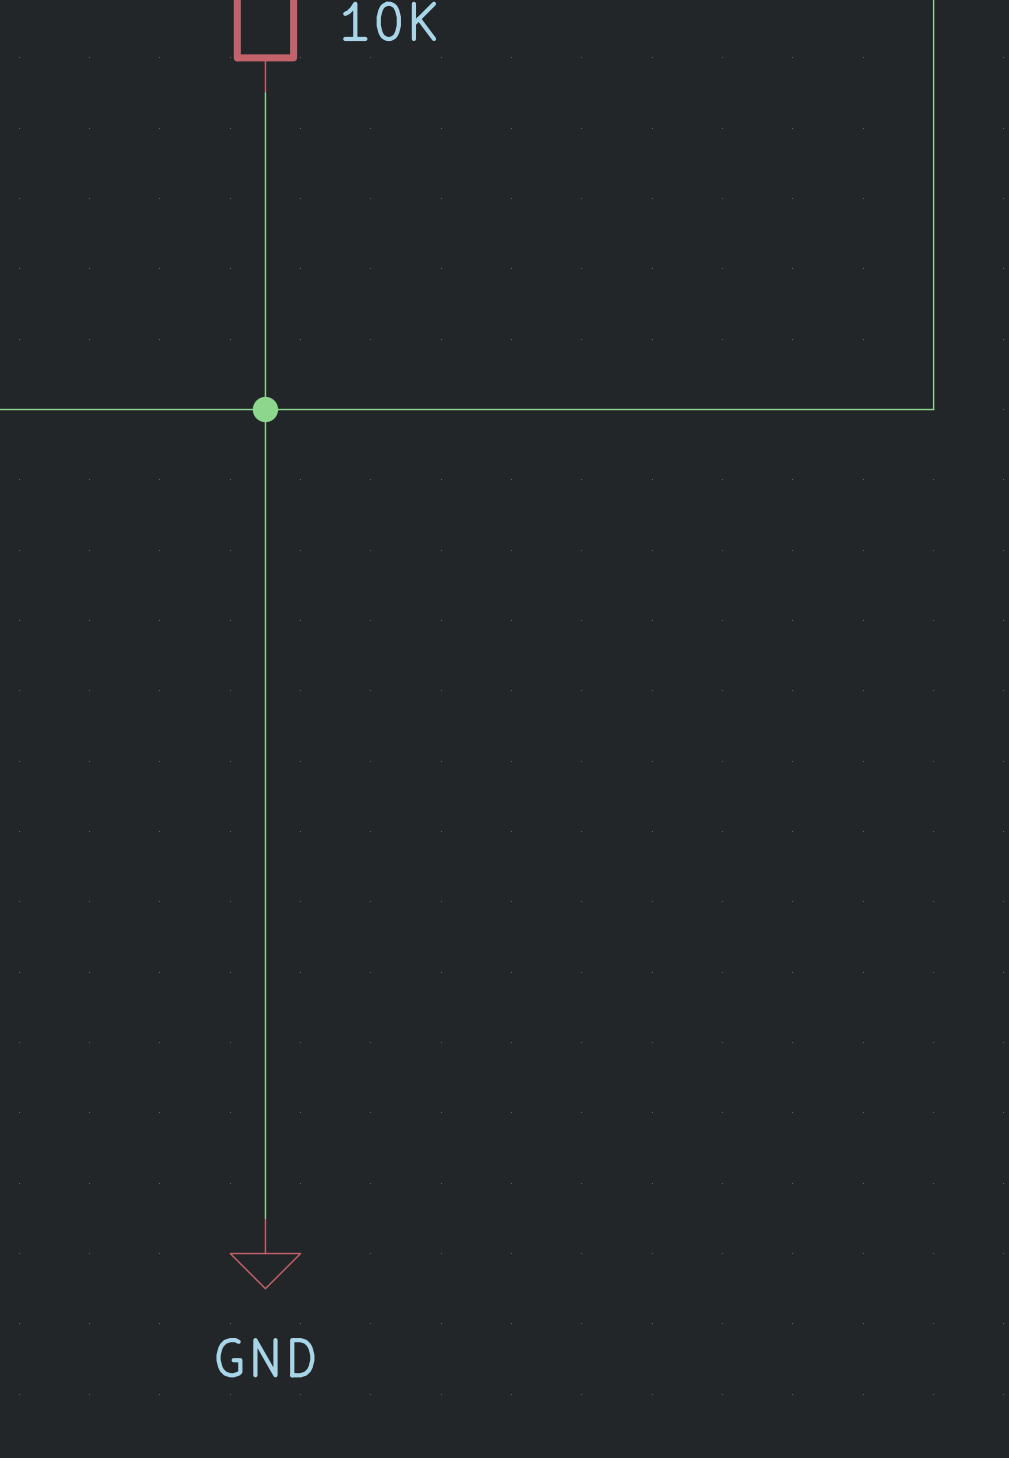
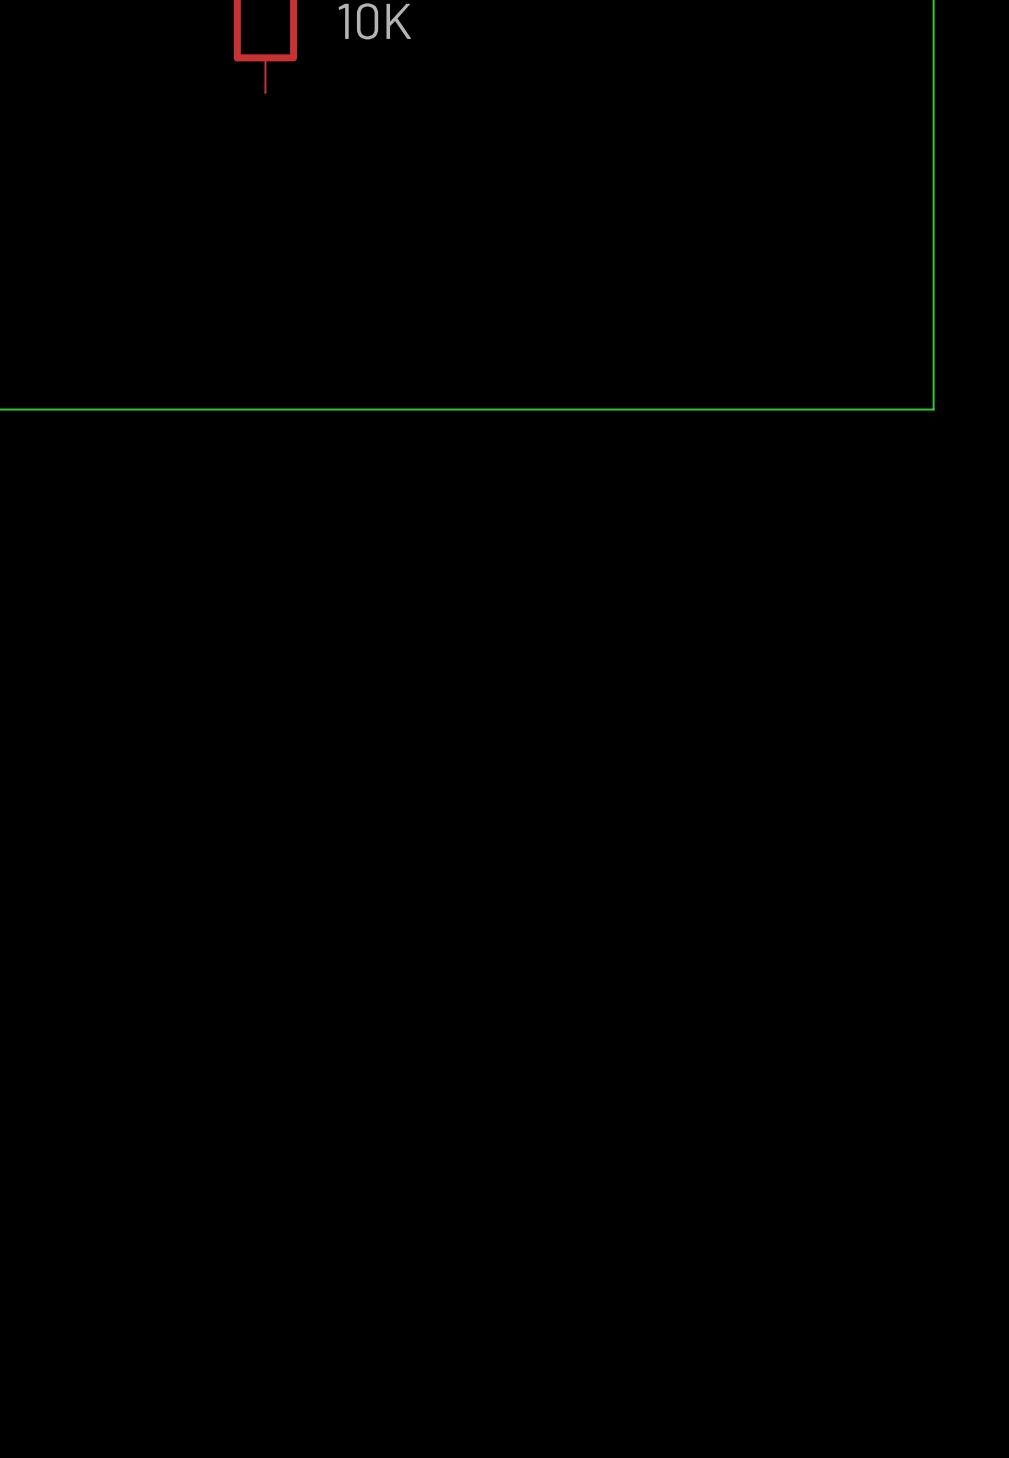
wire: (265, 93) (265, 1218) -> none
junction: (265, 409) -> none
power symbol: GND (265, 1253) -> none

